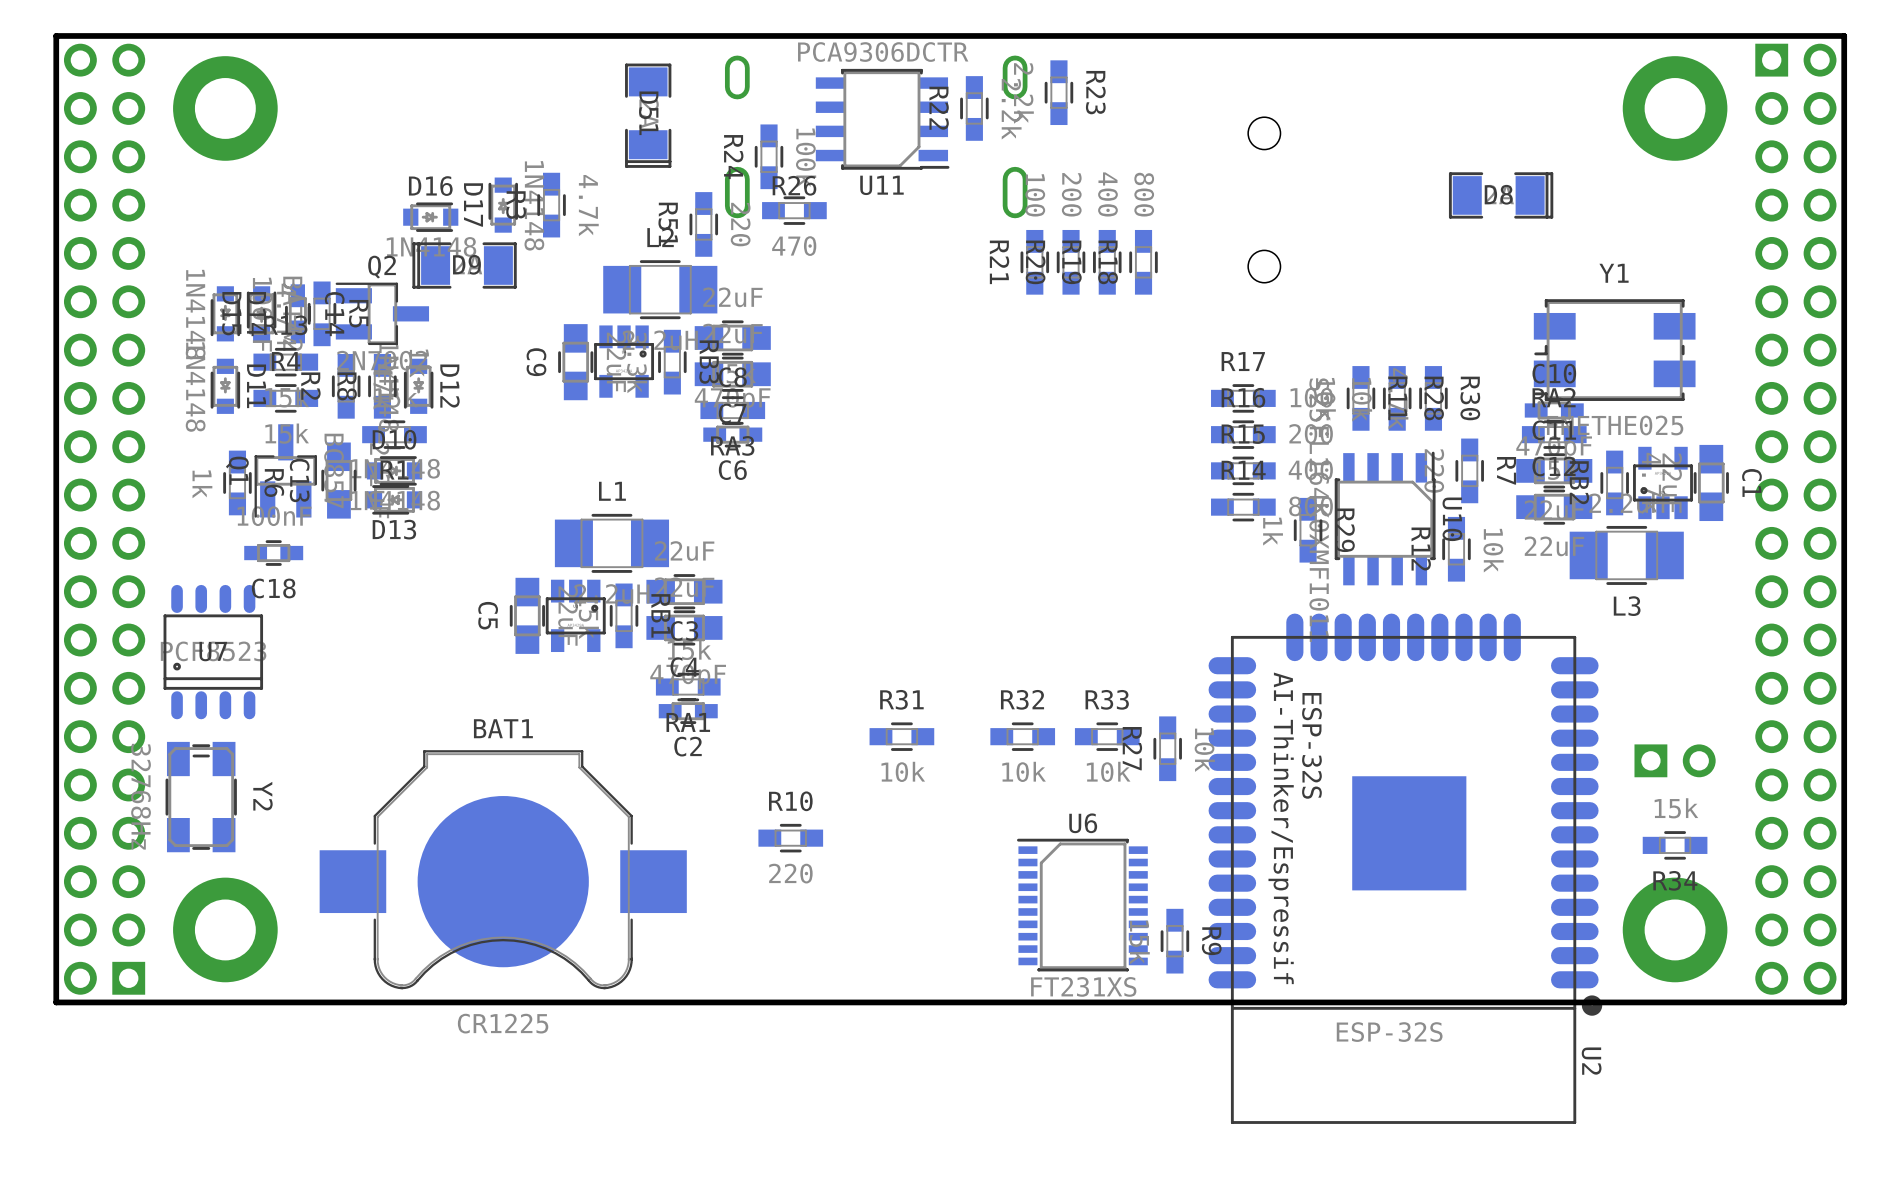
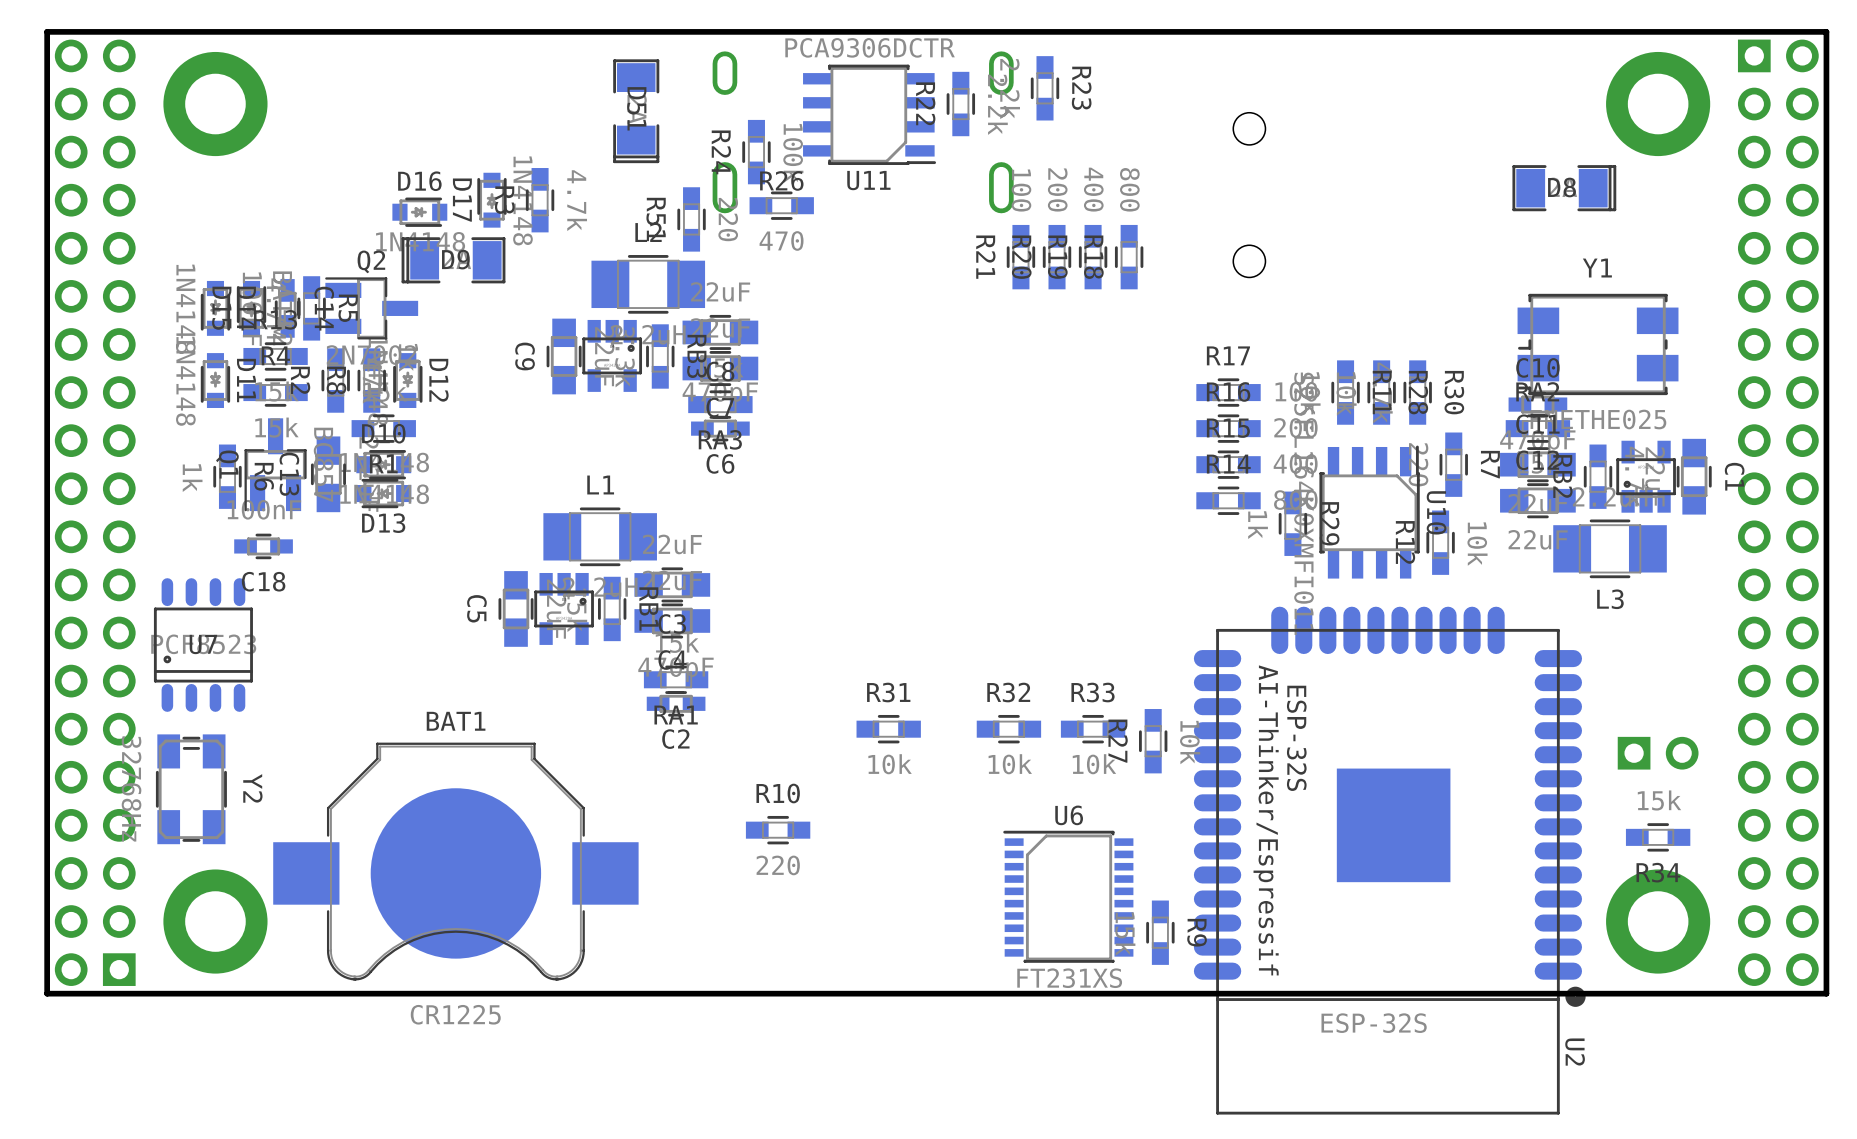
D8 position: (1501, 195) -> (1564, 188)
BAT1 position: (503, 869) -> (455, 861)

